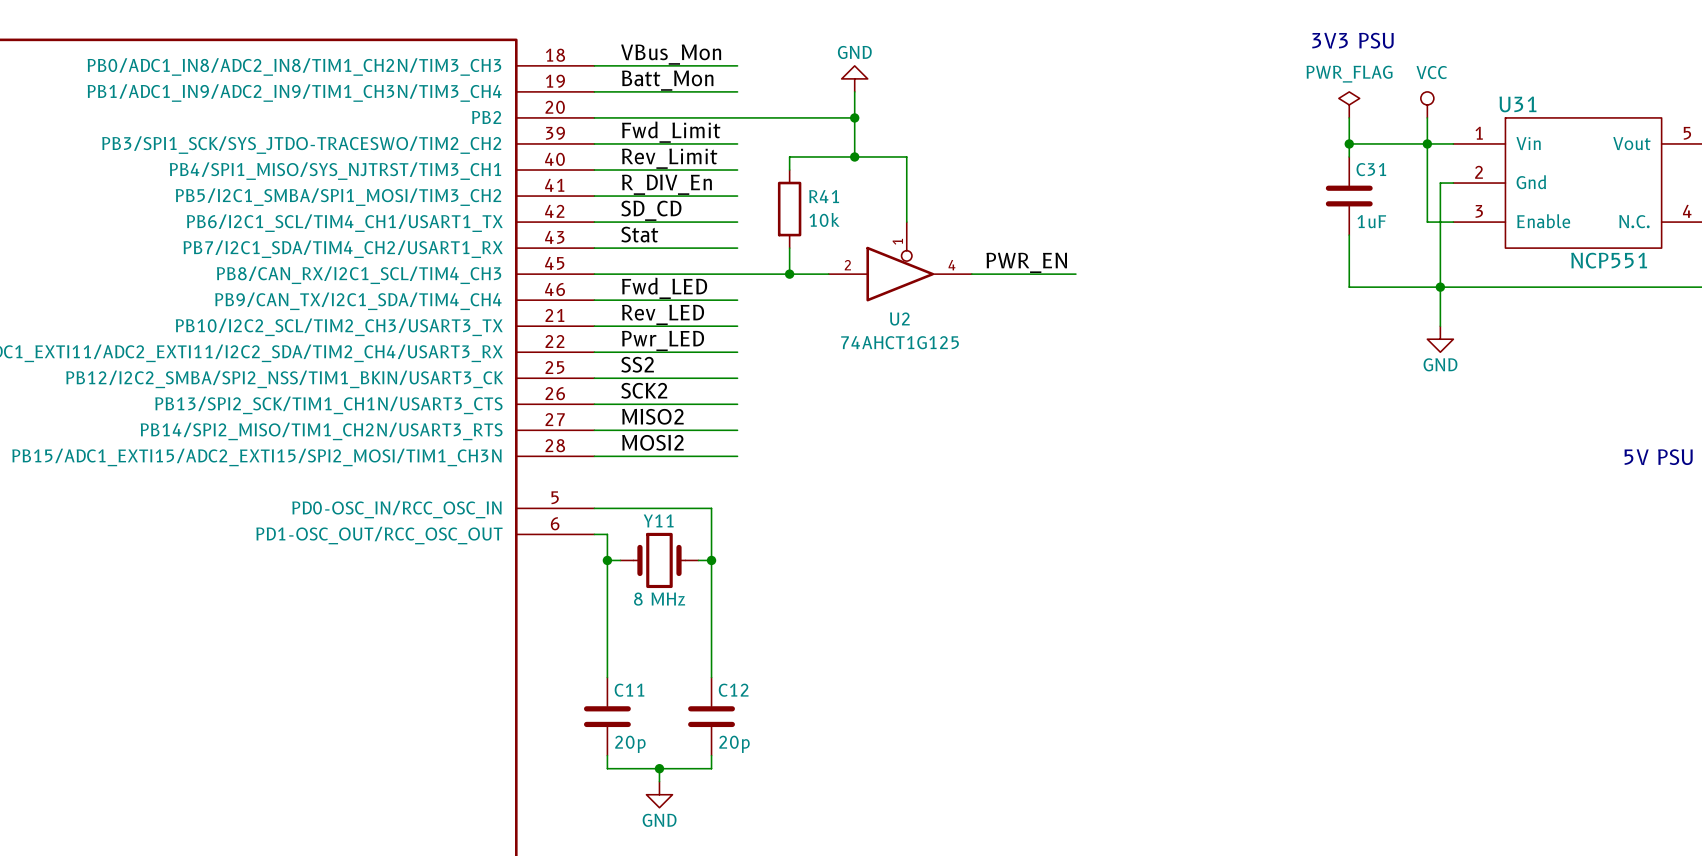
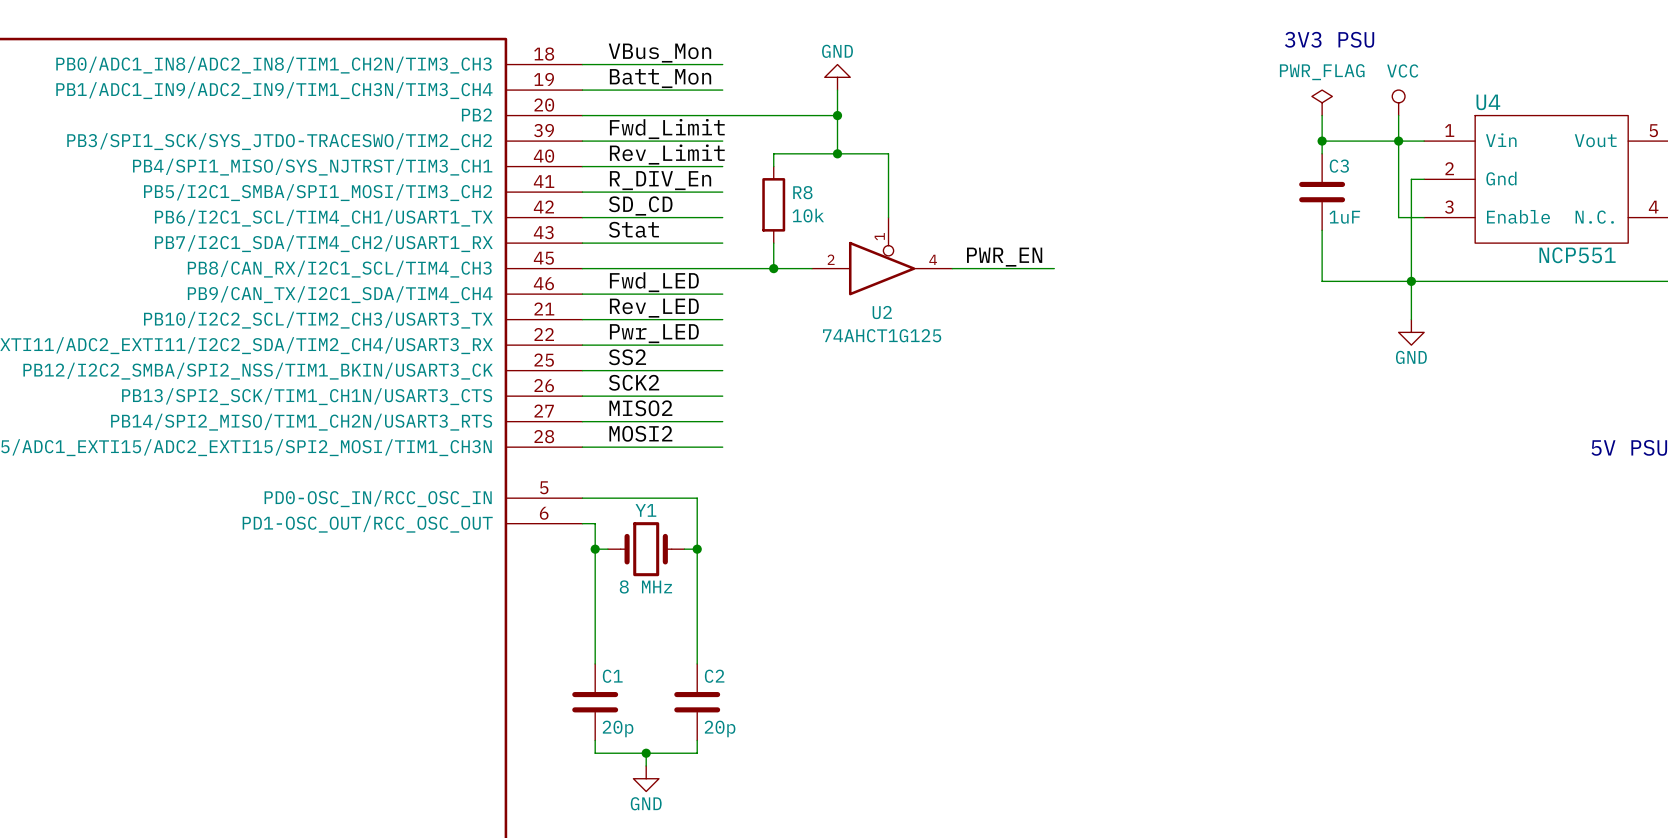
U31 name: U31 (1517, 104) -> U4 (1488, 102)
C31 name: C31 (1371, 169) -> C3 (1339, 166)
R41 name: R41 (824, 196) -> R8 (802, 192)
Y11 name: Y11 (658, 520) -> Y1 (645, 510)
C11 name: C11 (629, 690) -> C1 (612, 676)
C12 name: C12 (733, 690) -> C2 (714, 676)

